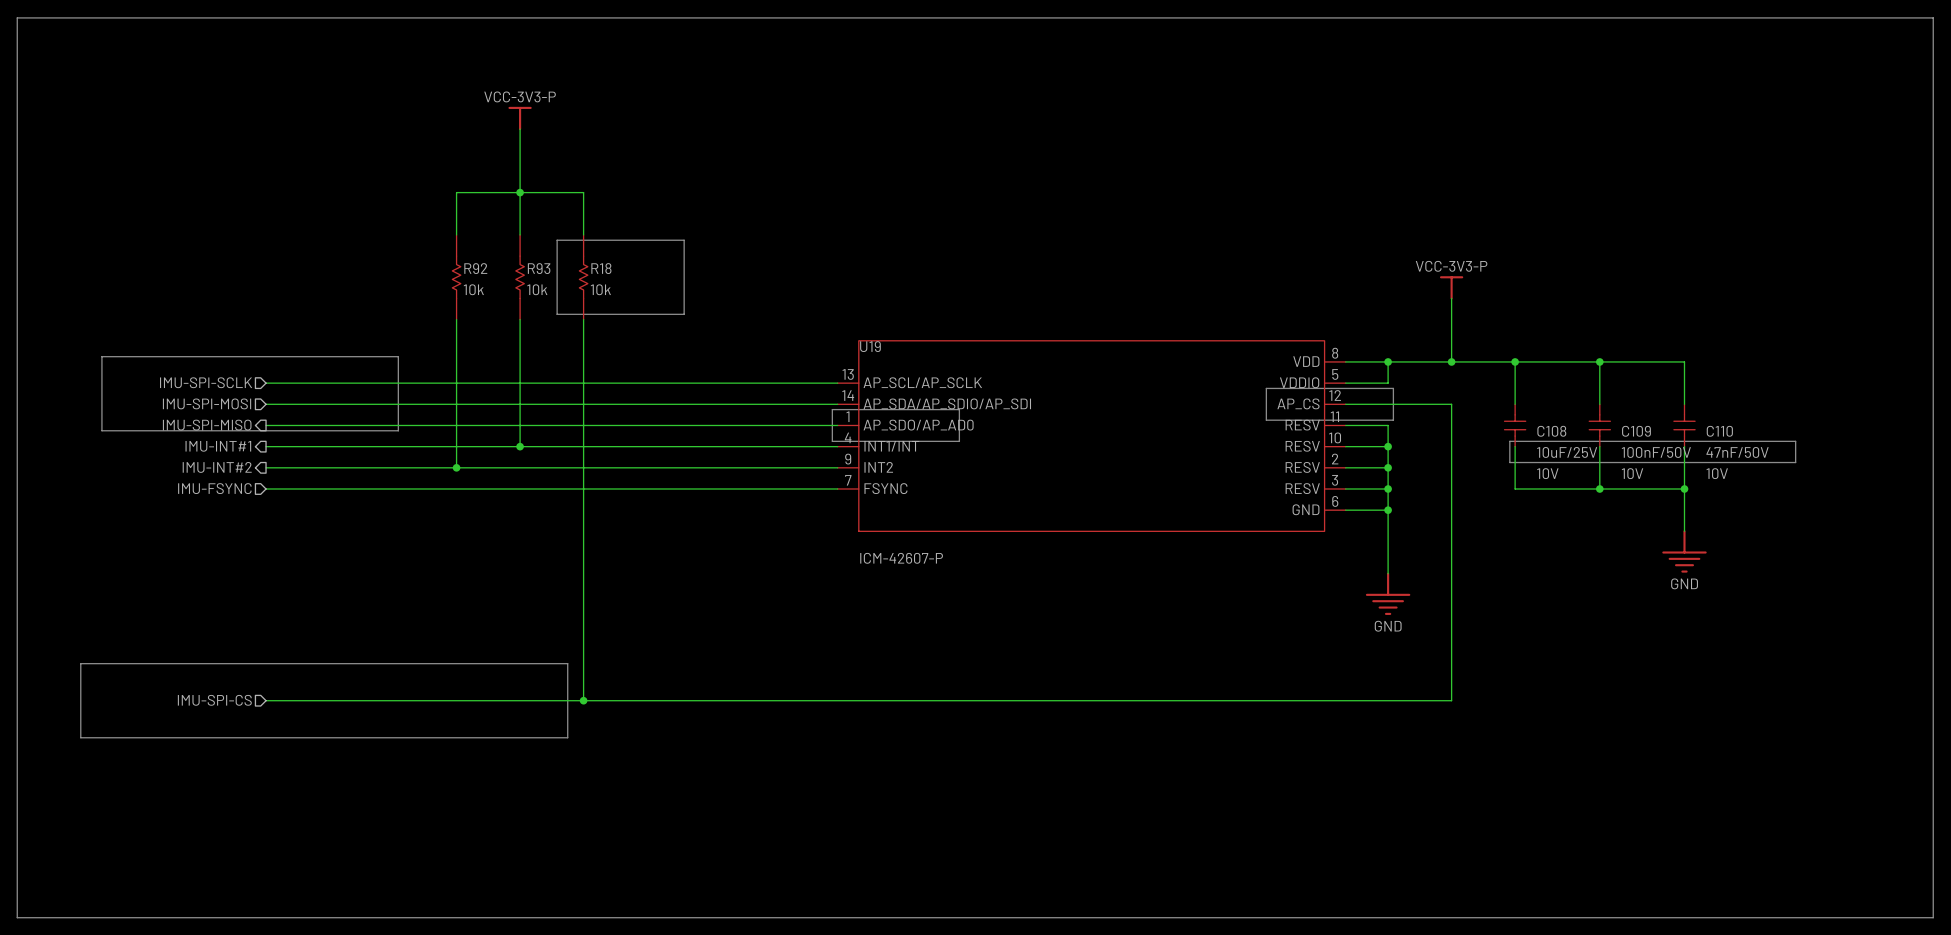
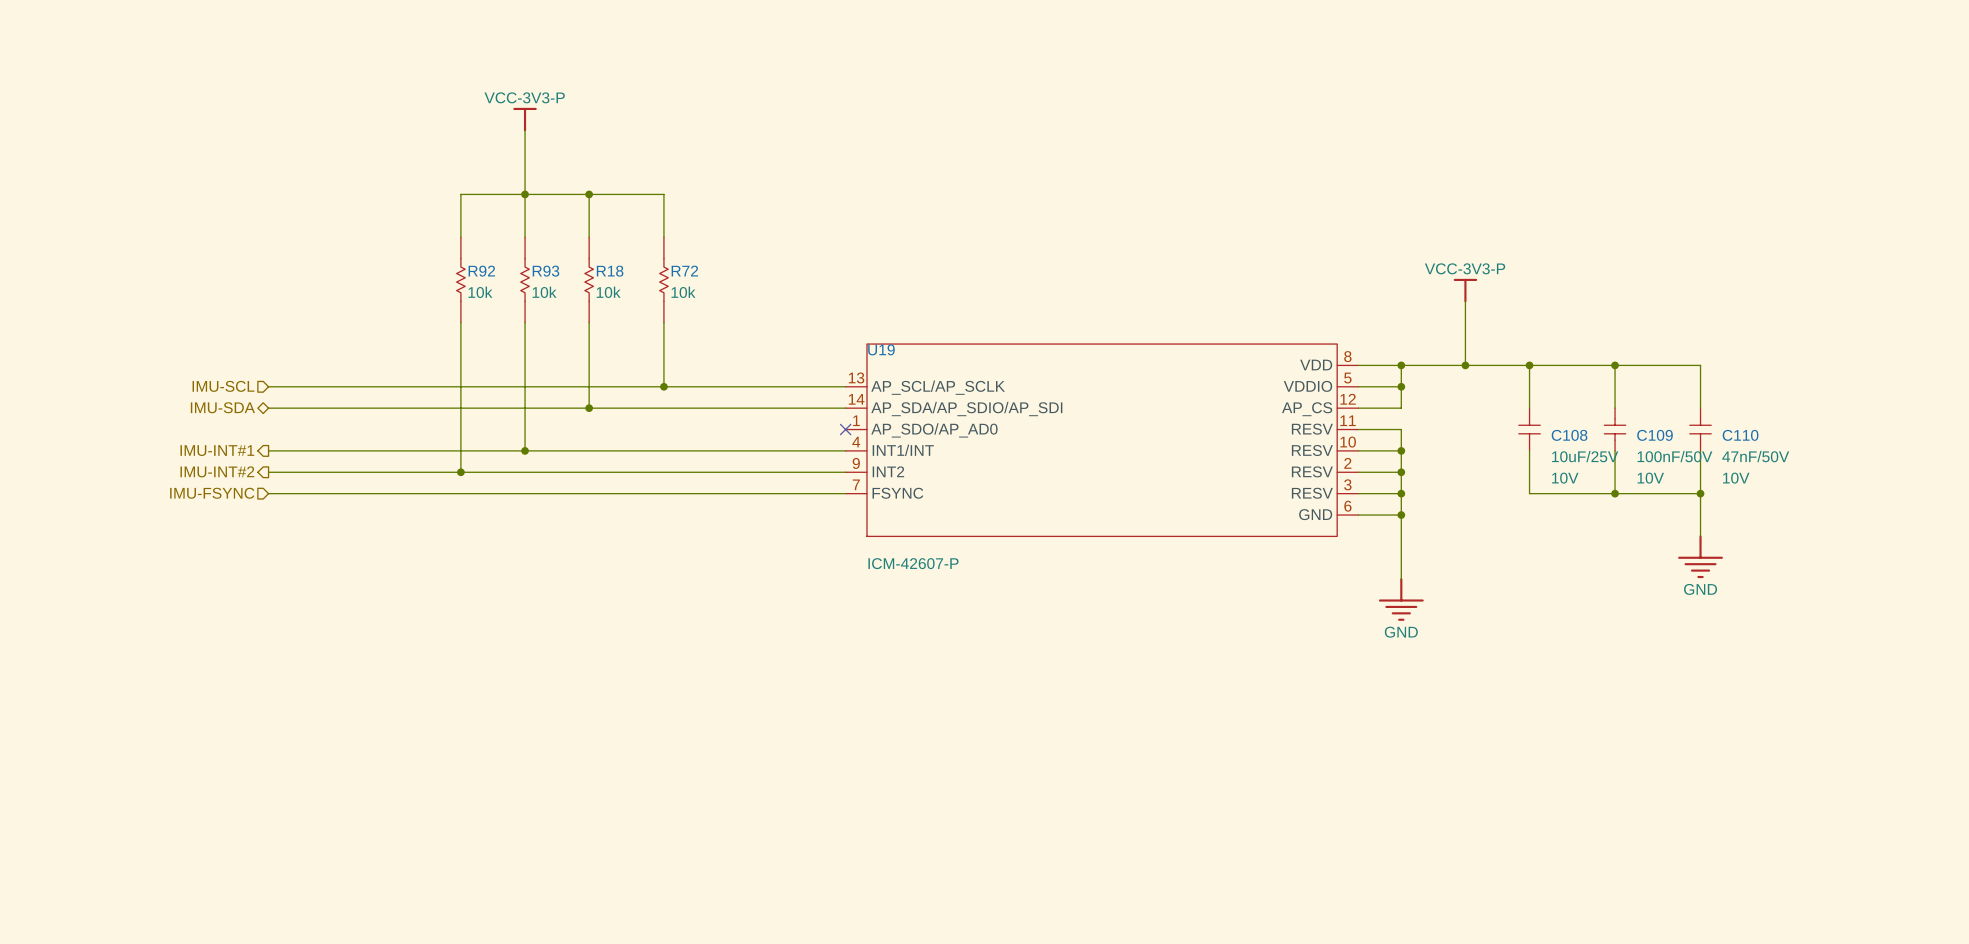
line: (17, 17) (1933, 17) (1933, 917) (17, 917) (17, 17) -> none
wire: none -> (589, 194) (663, 194) (663, 237)
junction: none -> (589, 194)
line: (557, 240) (684, 240) (684, 314) (557, 314) (557, 240) -> none
R72: none -> 10k (663, 279)
wire: none -> (663, 322) (663, 386)
line: (101, 356) (398, 356) (398, 430) (101, 430) (101, 356) -> none
hierarchical label: IMU-SPI-SCLK (206, 382) -> IMU-SCL (223, 386)
junction: none -> (663, 386)
junction: none -> (1401, 386)
line: (1266, 388) (1393, 388) (1393, 420) (1266, 420) (1266, 388) -> none
hierarchical label shape: input (207, 403) -> bidirectional (222, 407)
hierarchical label: IMU-SPI-MOSI (207, 403) -> IMU-SDA (222, 407)
wire: (583, 404) (583, 700) -> none
junction: none -> (589, 408)
wire: (1388, 404) (1451, 404) (1451, 700) (266, 700) -> (1401, 408) (1401, 386)
line: (832, 409) (959, 409) (959, 441) (832, 441) (832, 409) -> none
hierarchical label: IMU-SPI-MISO (207, 425) -> none
wire: (266, 425) (837, 425) -> none
no-connect mark: none -> (845, 429)
line: (1509, 441) (1795, 441) (1795, 462) (1509, 462) (1509, 441) -> none
line: (80, 663) (567, 663) (567, 737) (80, 737) (80, 663) -> none
hierarchical label: IMU-SPI-CS (214, 700) -> none
junction: (583, 700) -> none

